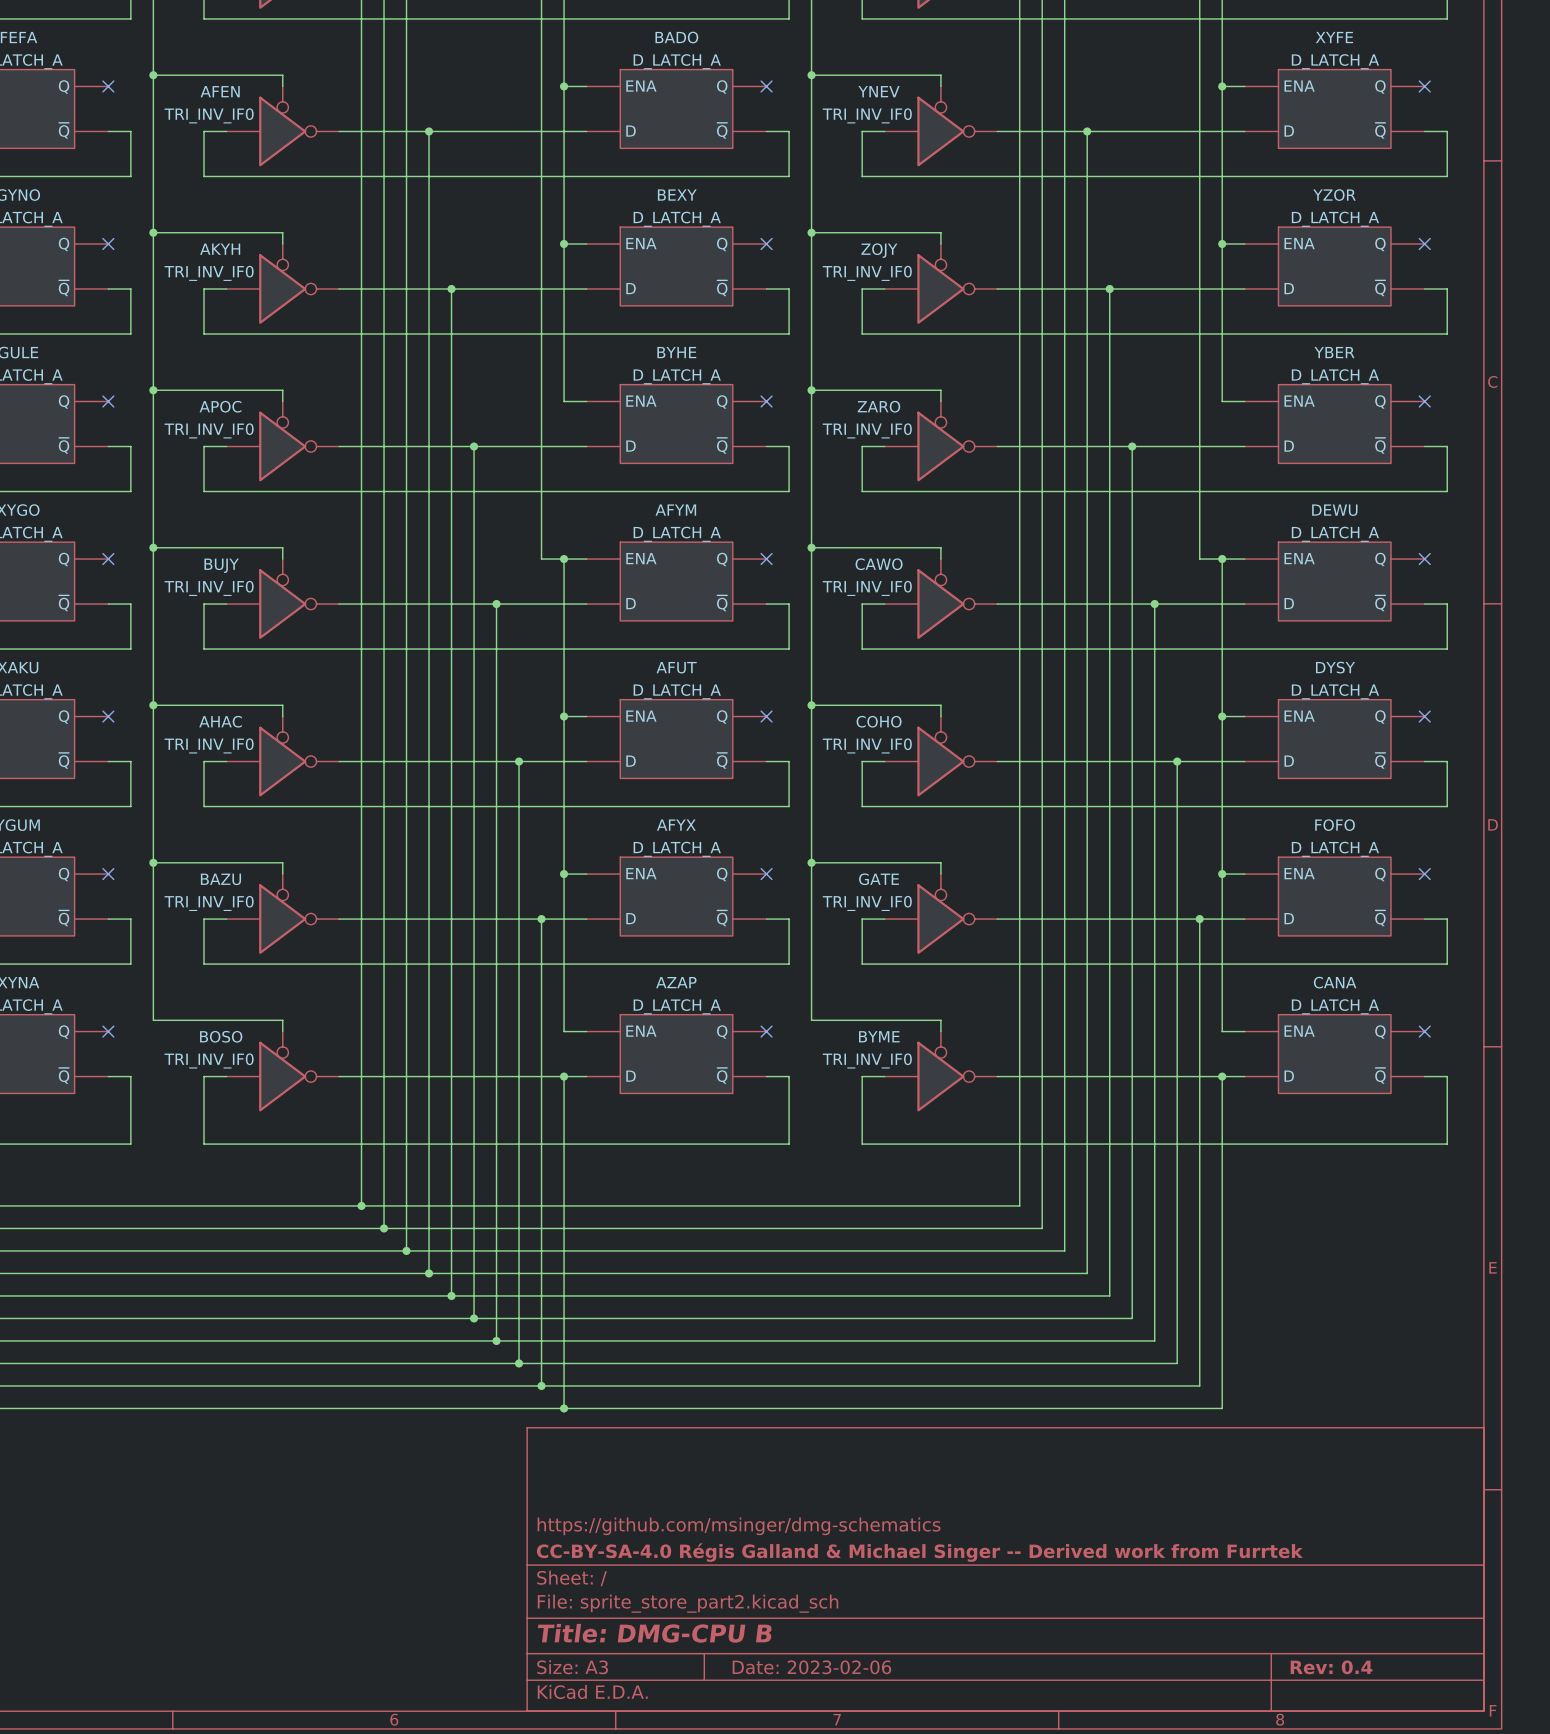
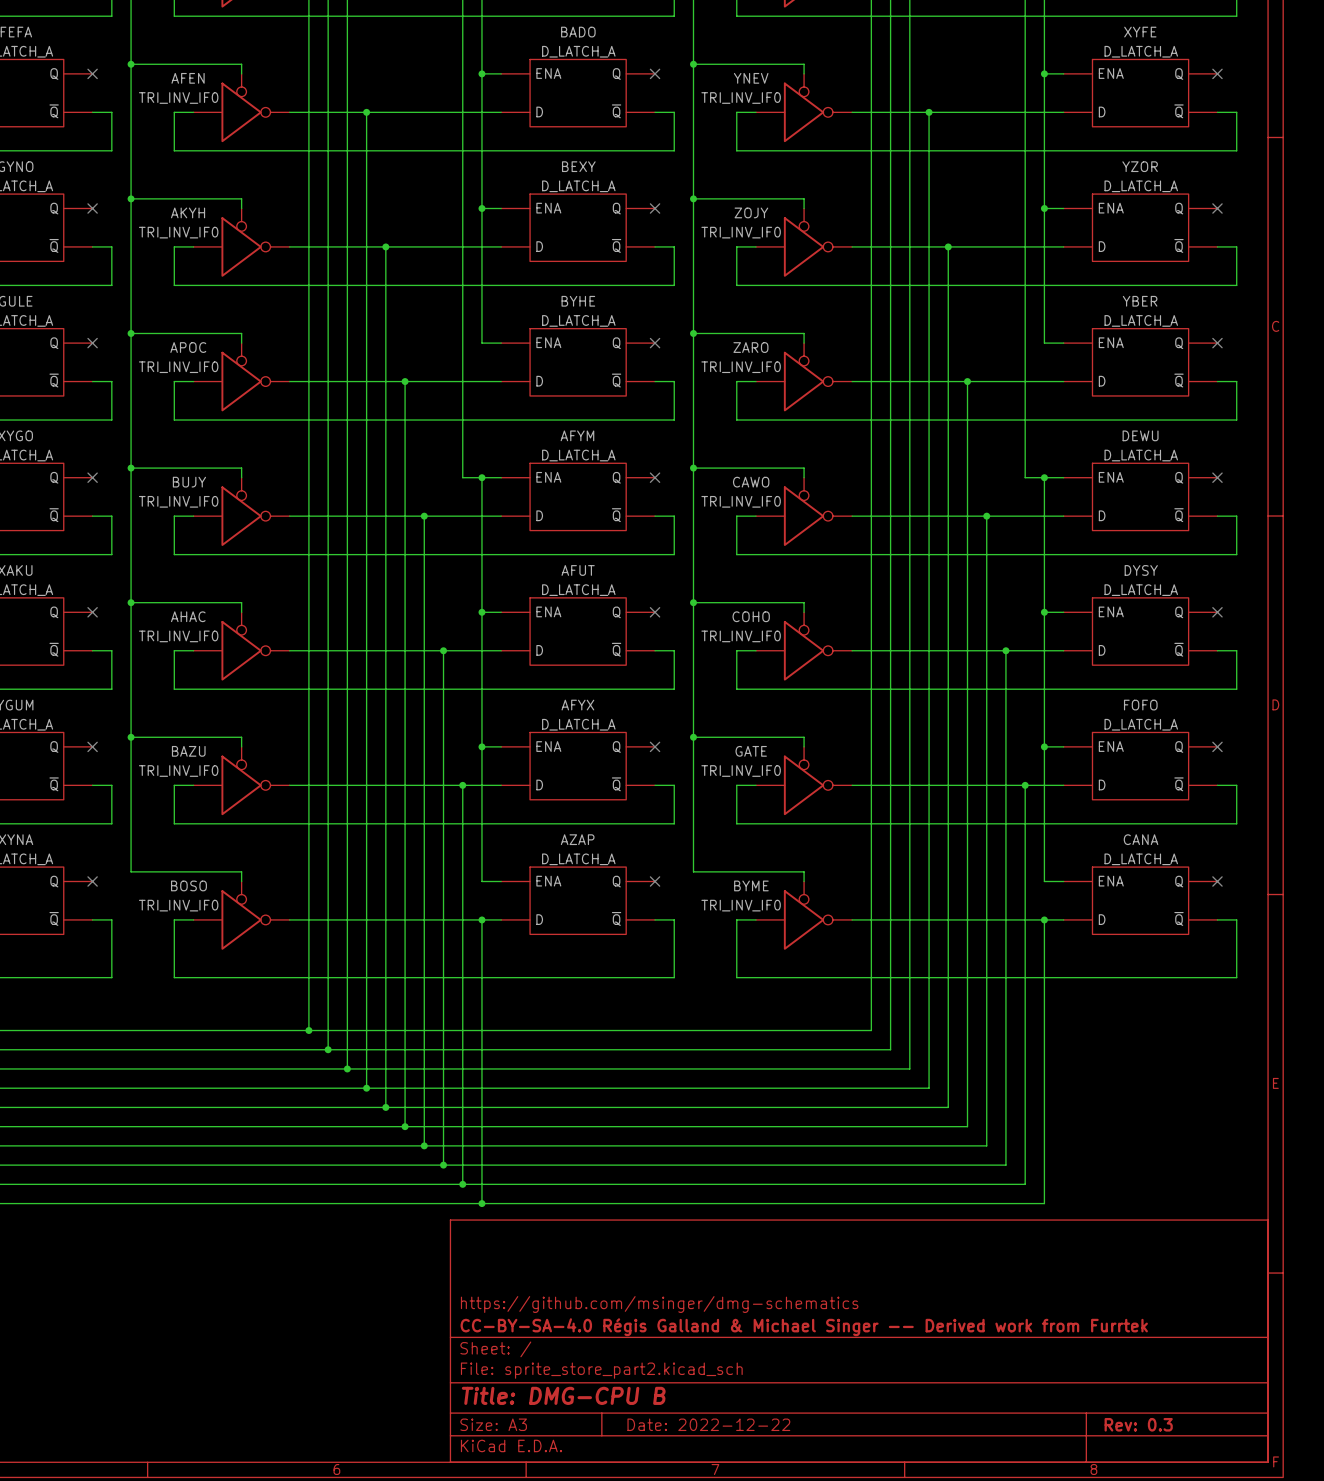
title block: Date: 2023-02-06 (811, 1667) -> Date: 2022-12-22 (708, 1424)
title block: Rev: 0.4 (1331, 1667) -> Rev: 0.3 (1138, 1424)

